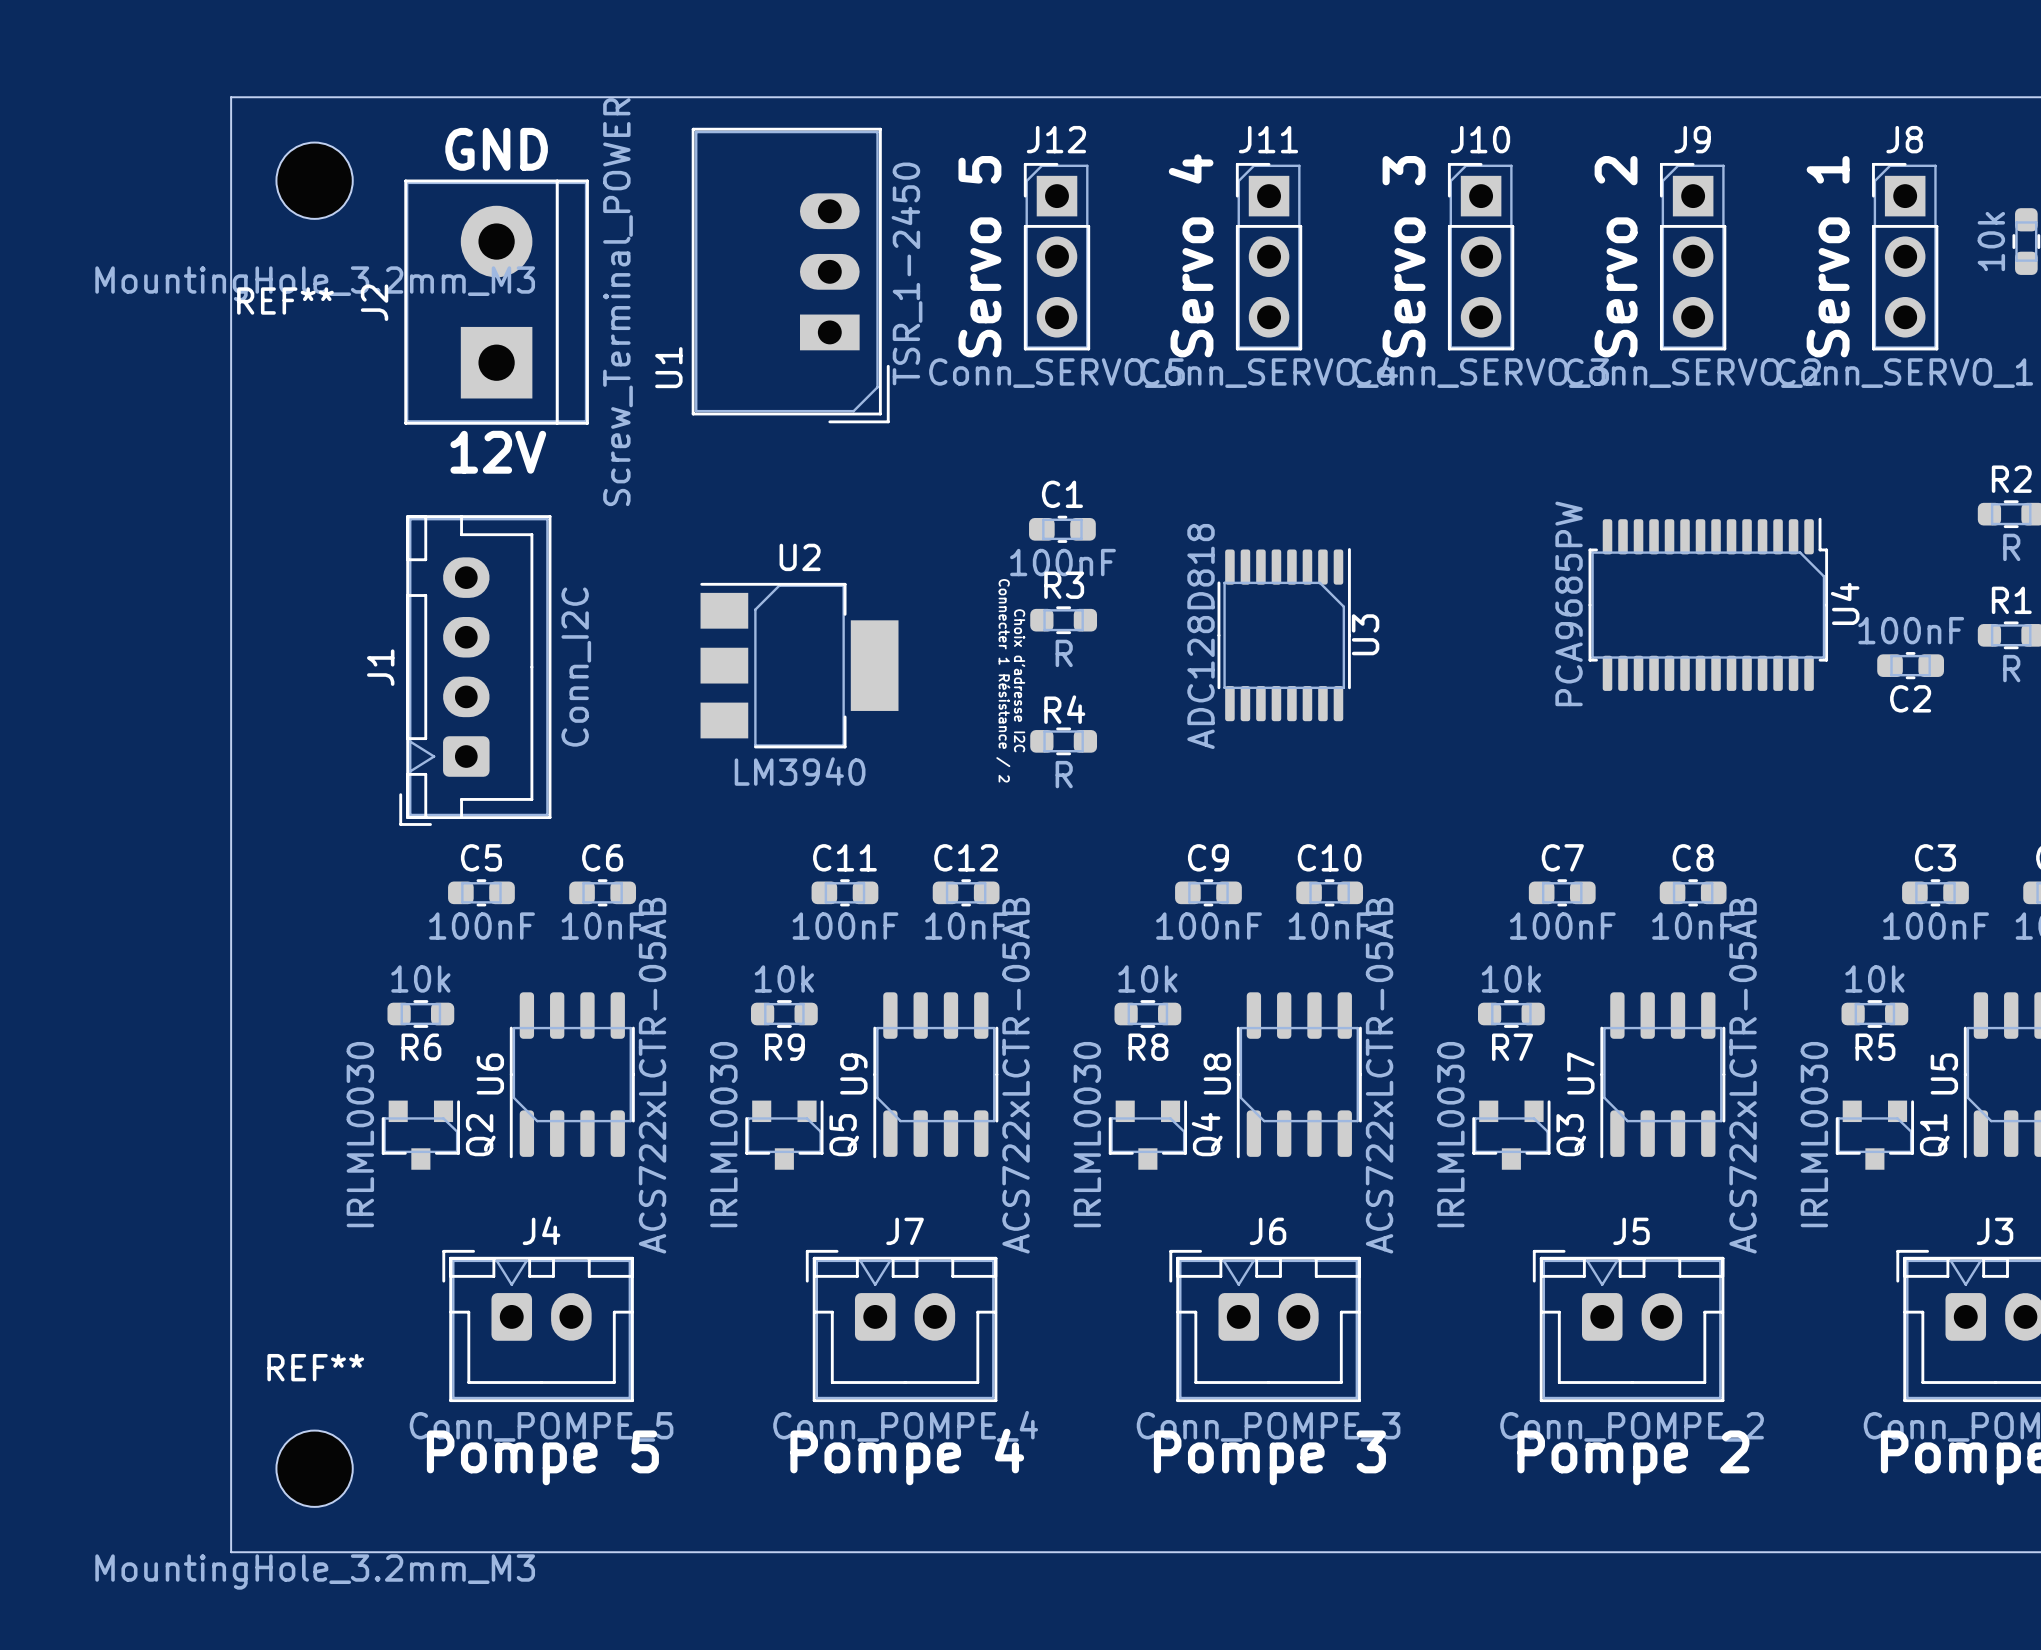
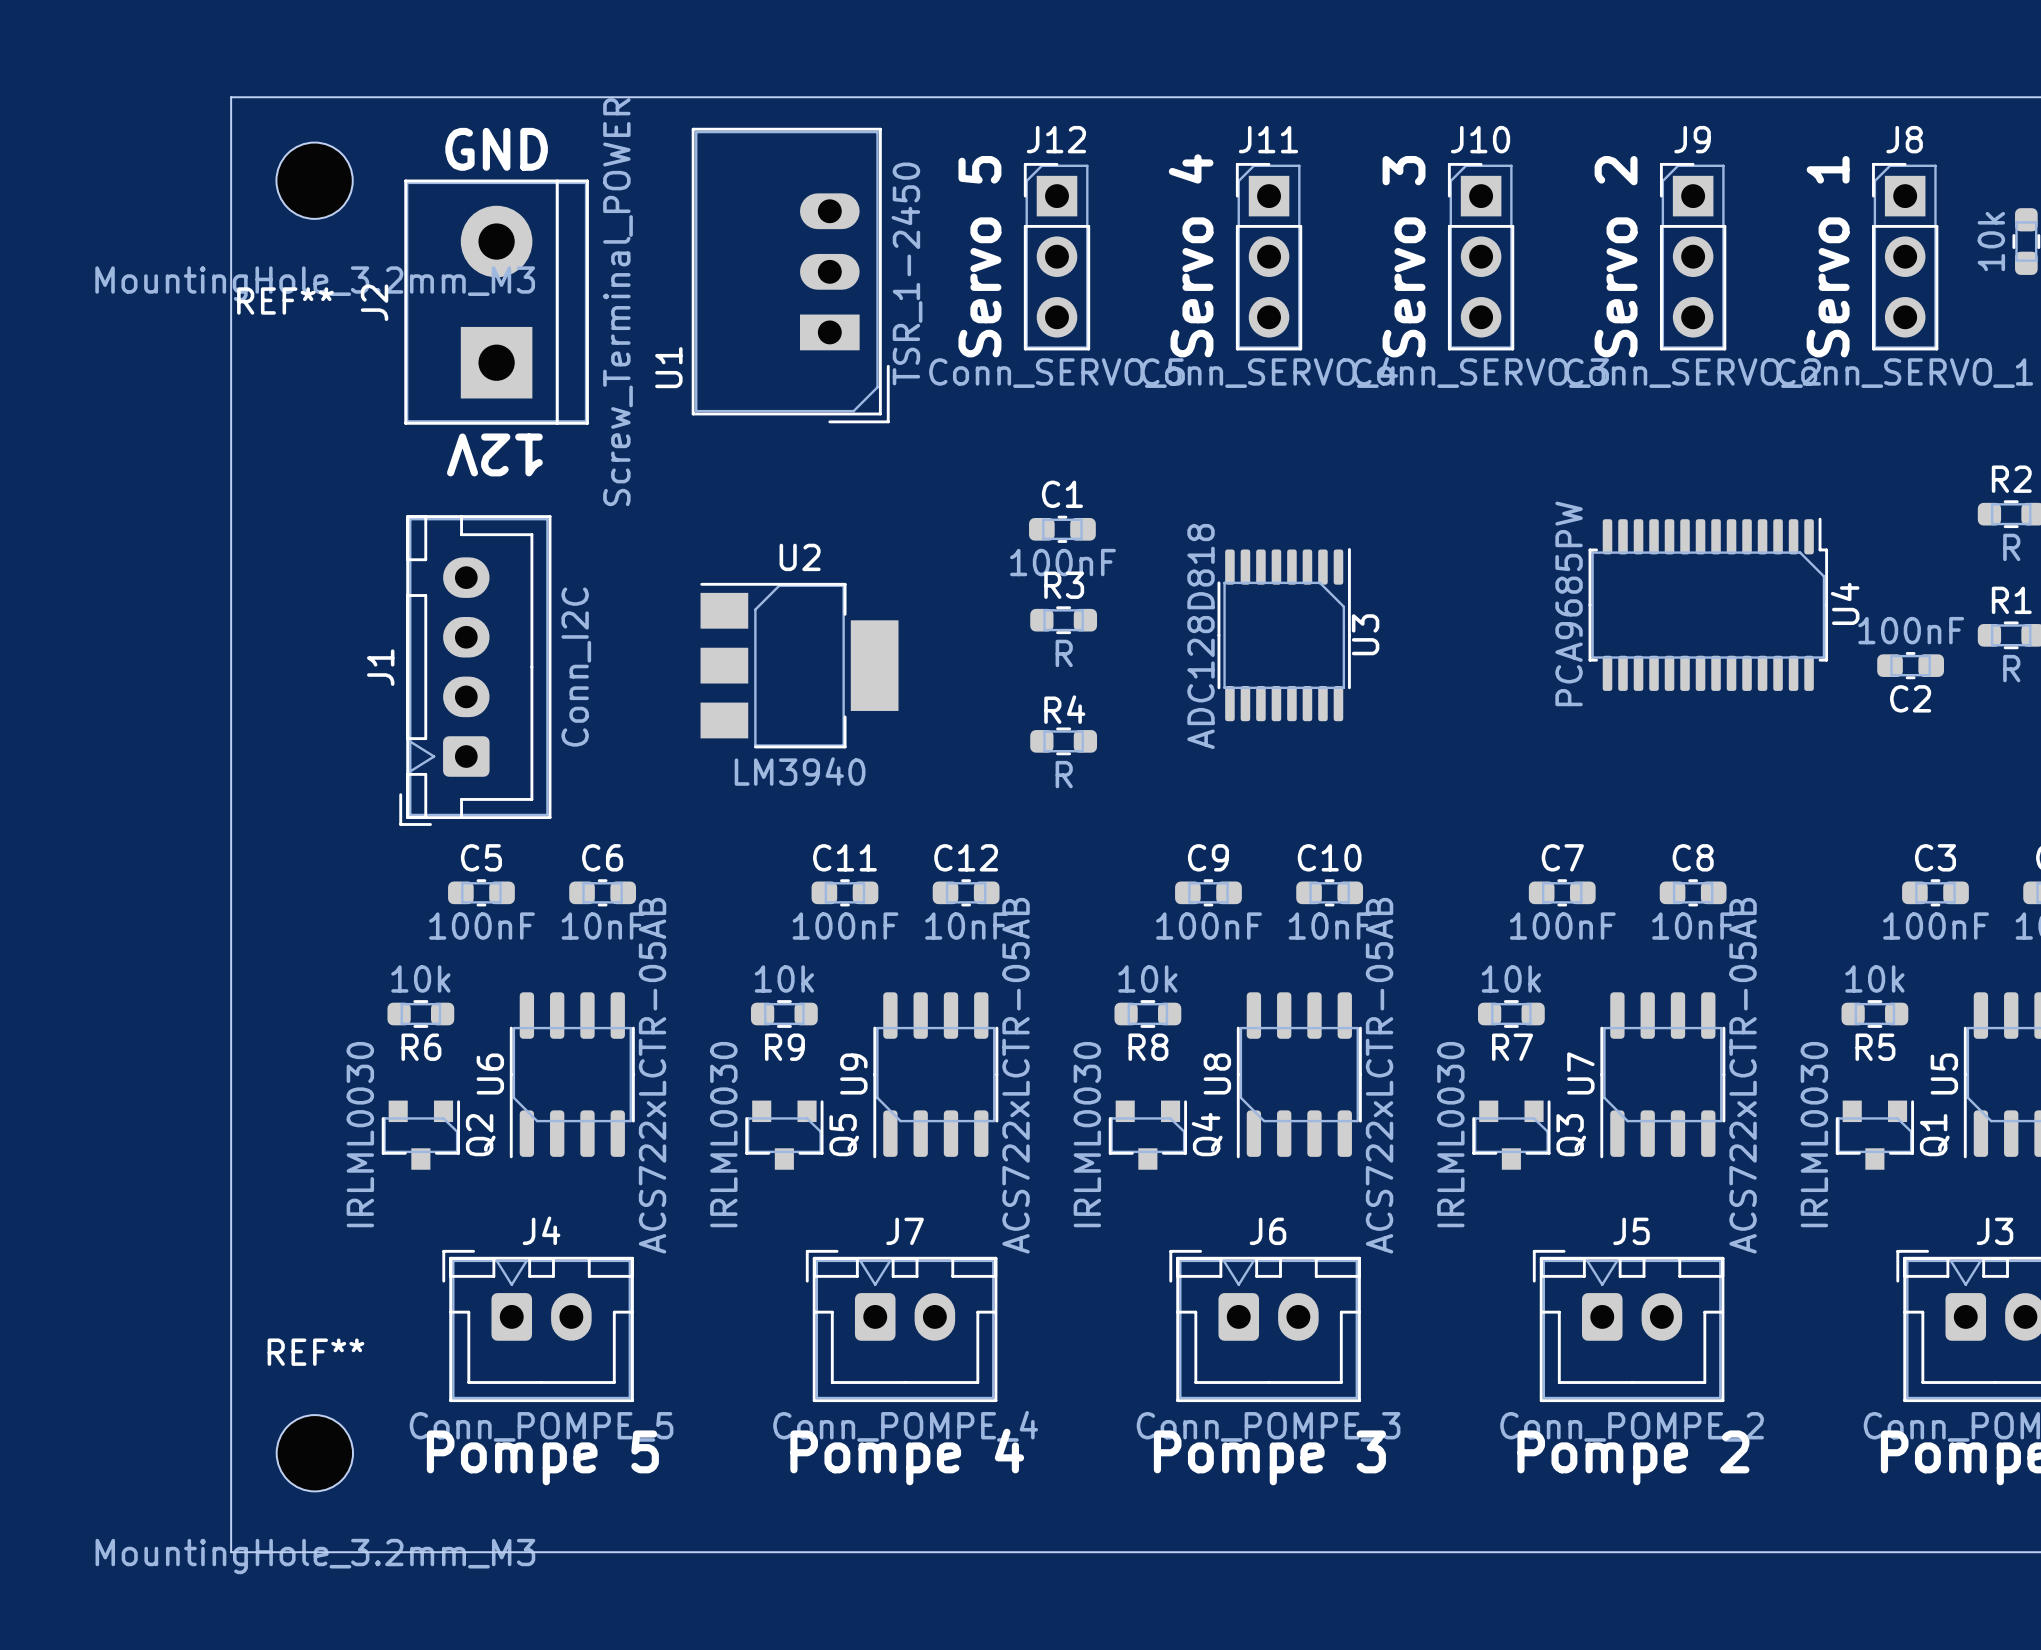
text rotation: 0° (498, 452) -> 180° (494, 454)
text: Connecter 1 Résistance / 2 (1003, 680) -> none
text: Choix d'adresse I2C (1019, 680) -> none
REF** position: (314, 1468) -> (314, 1453)

